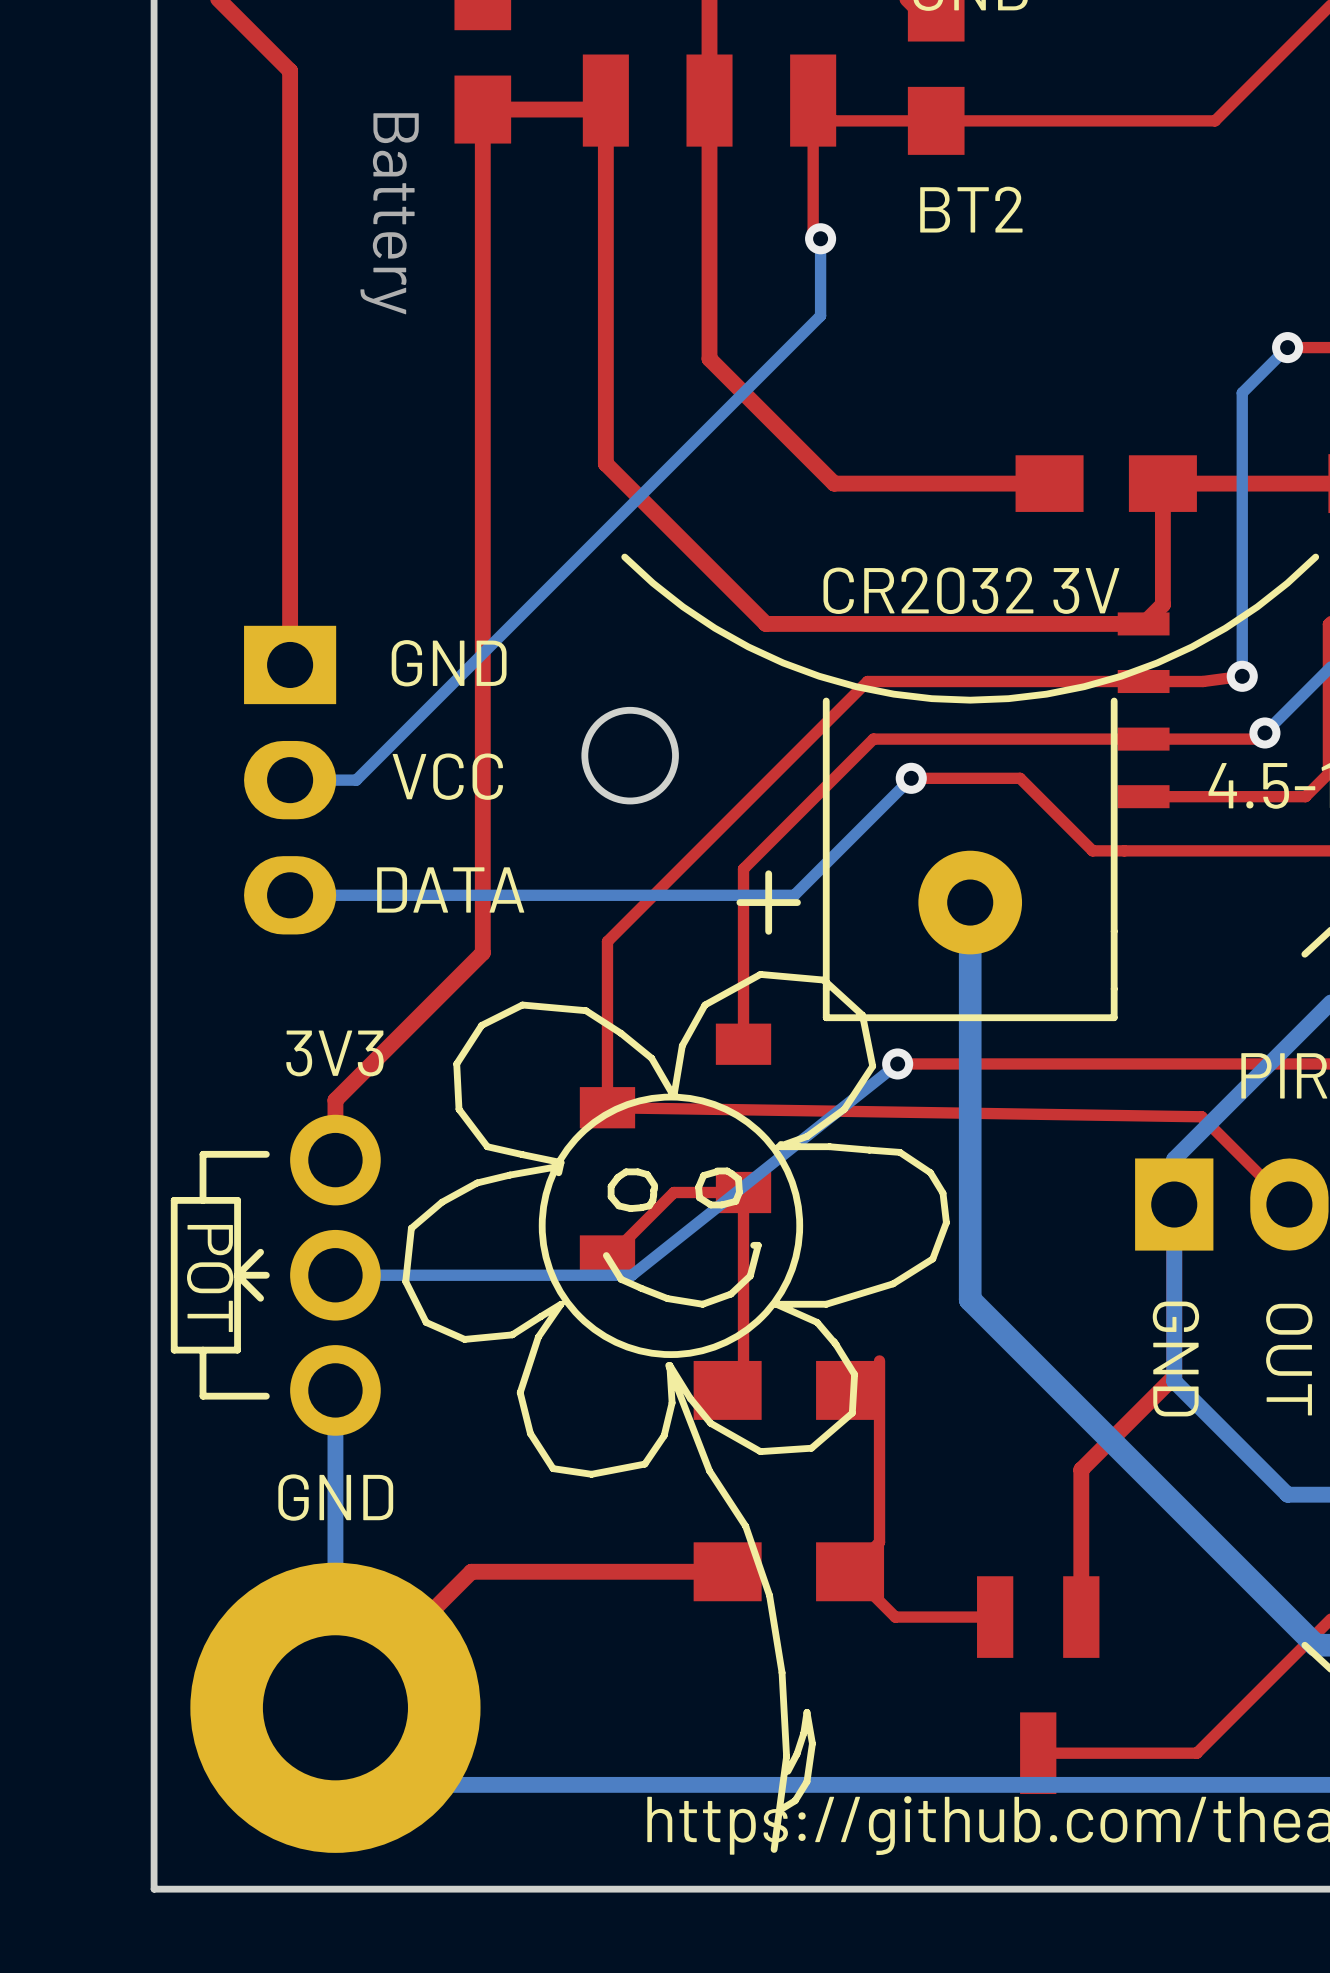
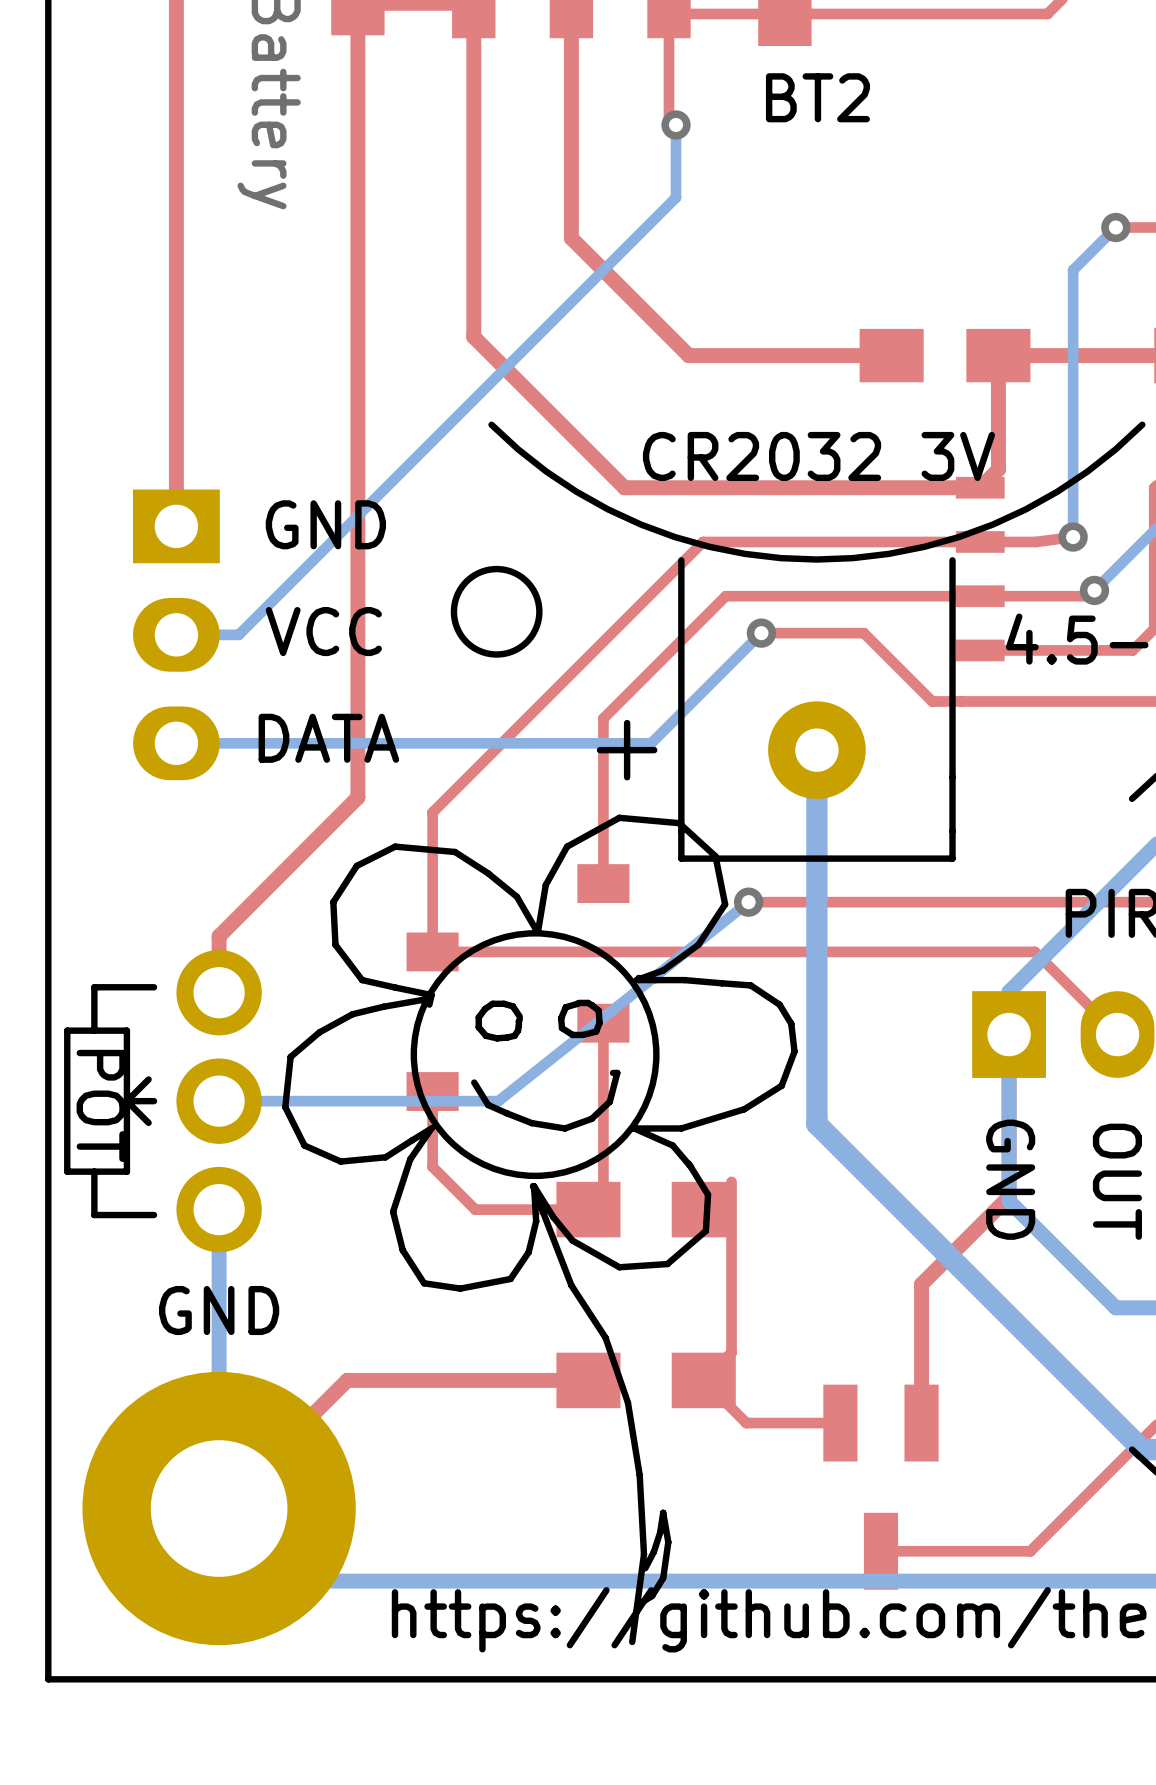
top track: (867, 681) (607, 941) (607, 1107) (1201, 1116) -> (720, 541) (703, 541) (432, 812) (432, 951) (1034, 951)
text: 3V3 (334, 1053) -> none
part position: (607, 1181) -> (432, 1021)
top track: (743, 1192) (673, 1192) (610, 1255) (607, 1255) -> none
top track: none -> (432, 1108) (432, 1166) (475, 1209) (588, 1209)

